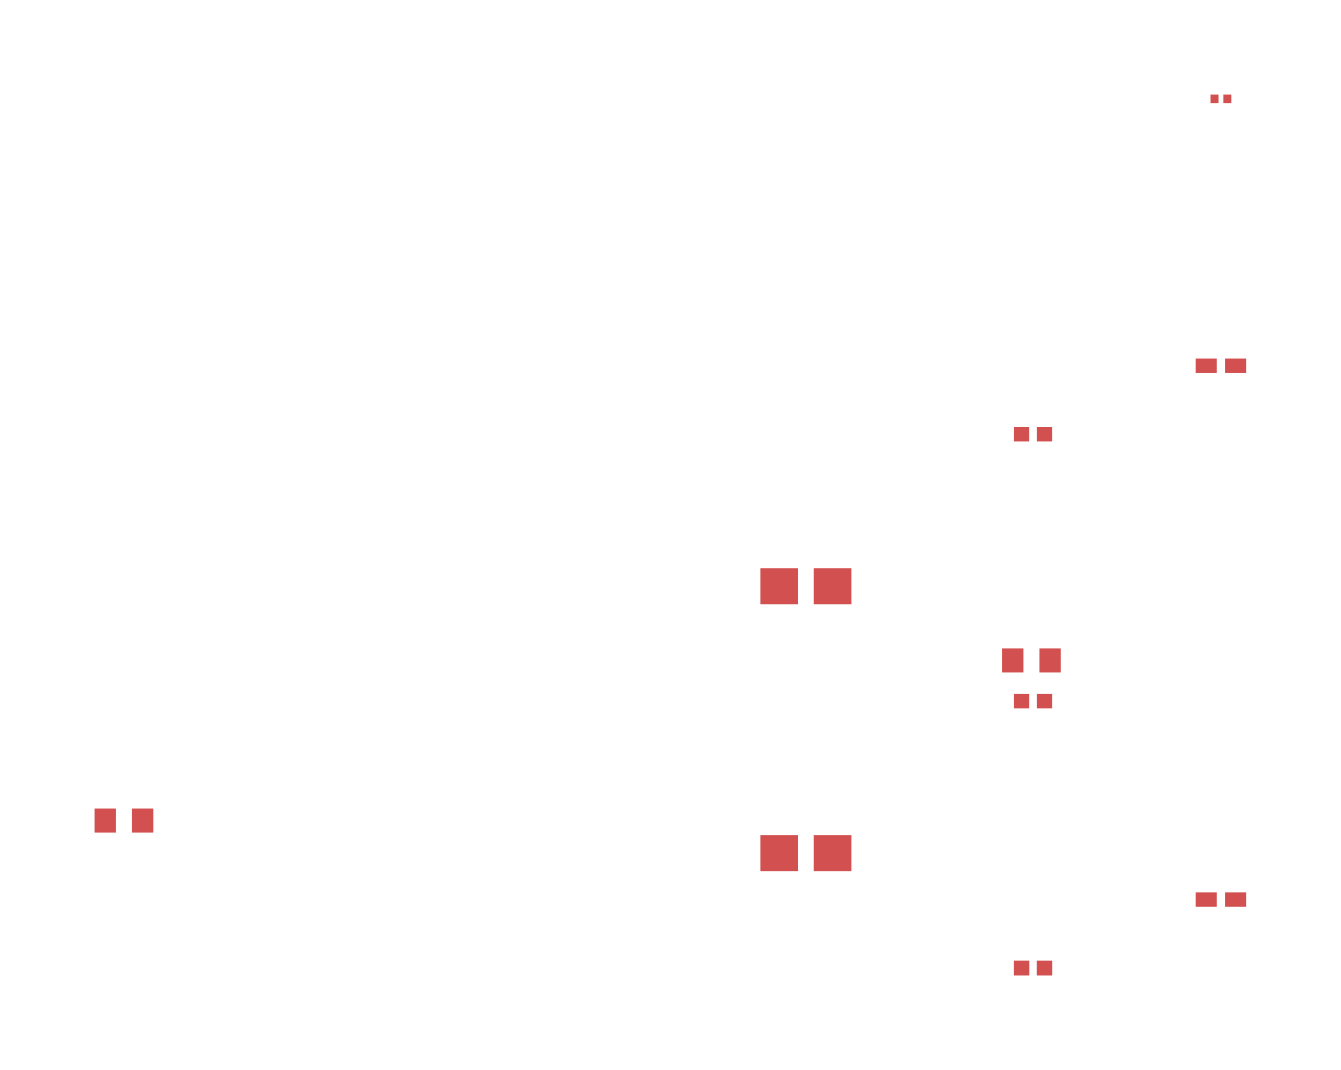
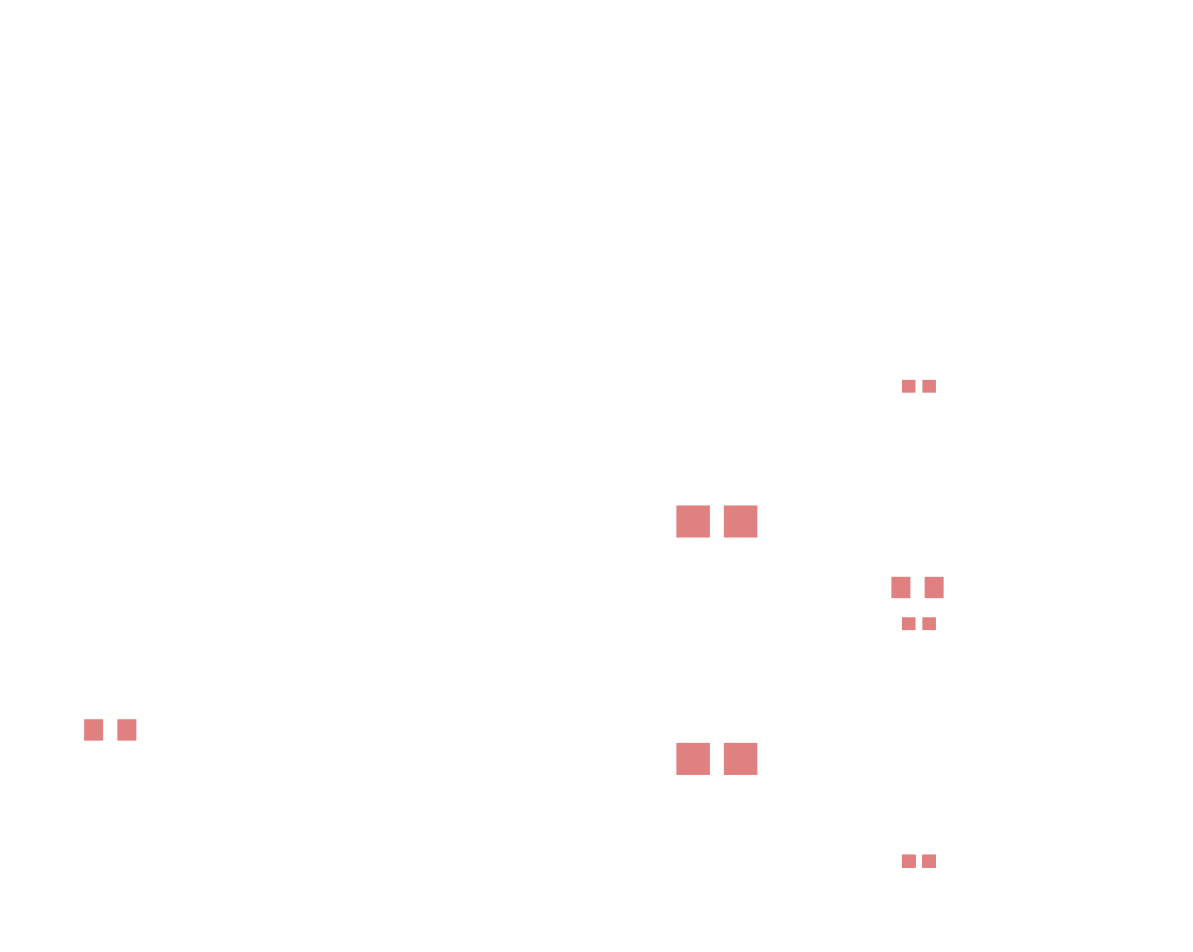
part: (1220, 98) -> none
part: (1220, 365) -> none
part: (1220, 899) -> none

